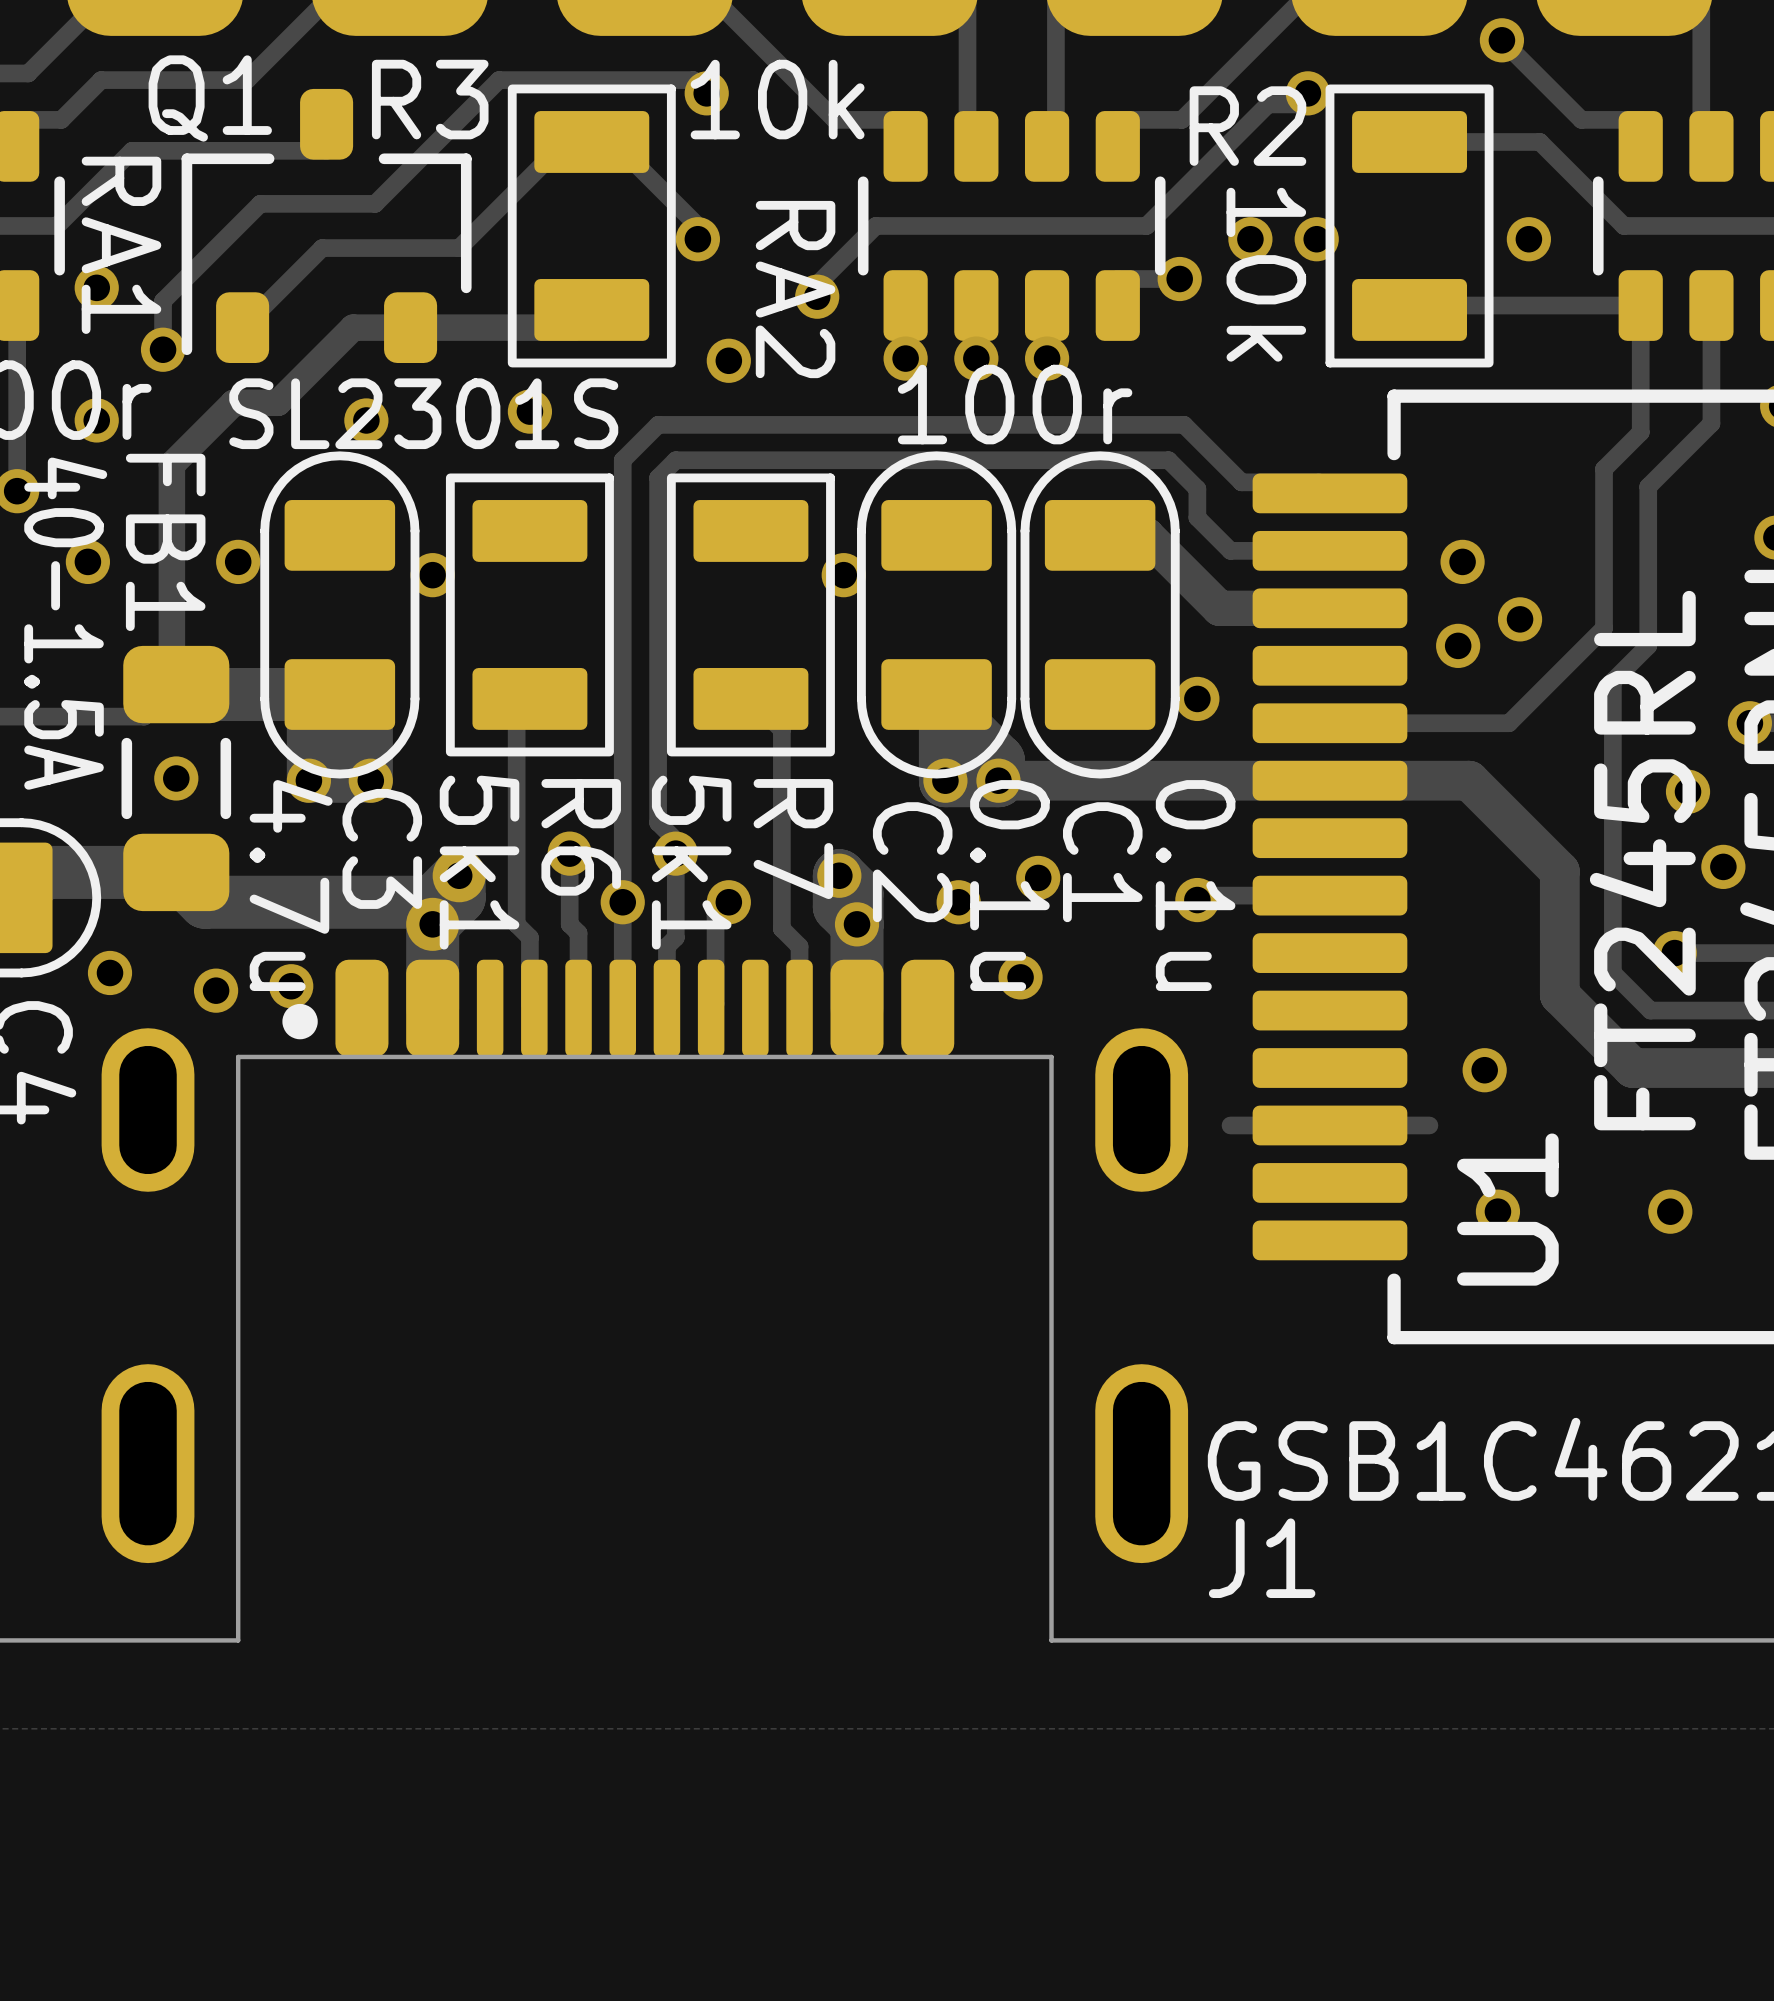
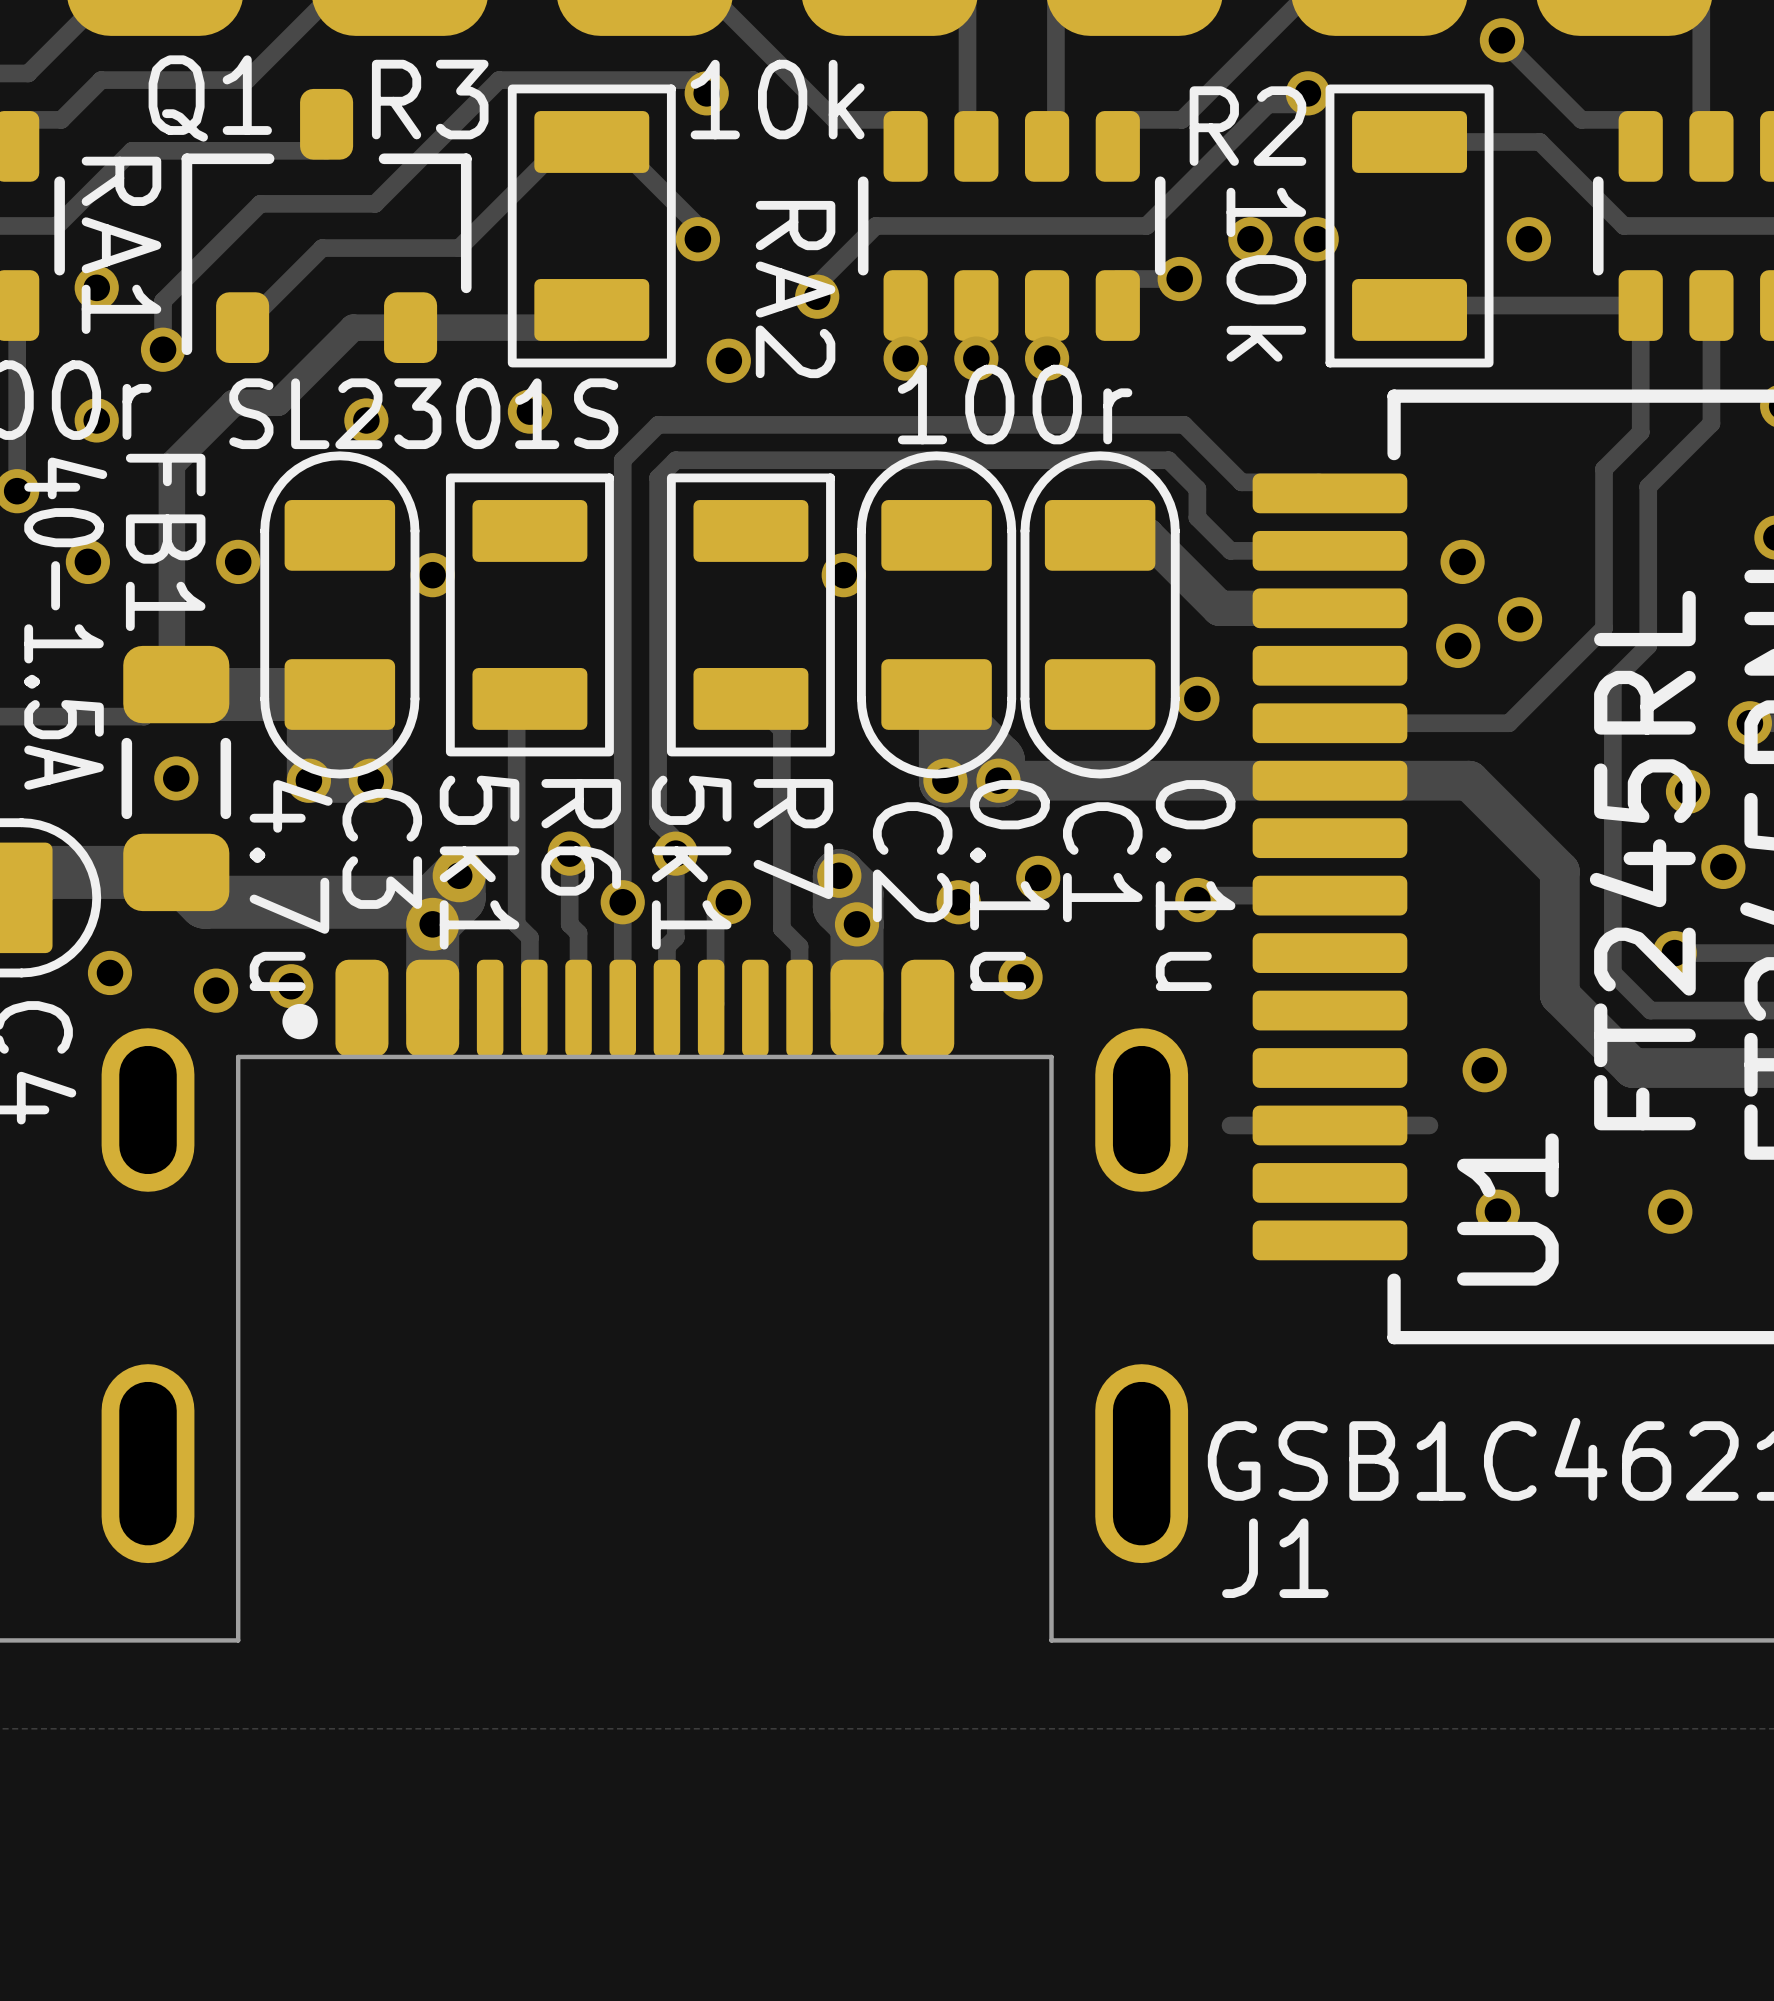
J1 name position: J1 (1262, 1558) -> J1 (1275, 1558)

